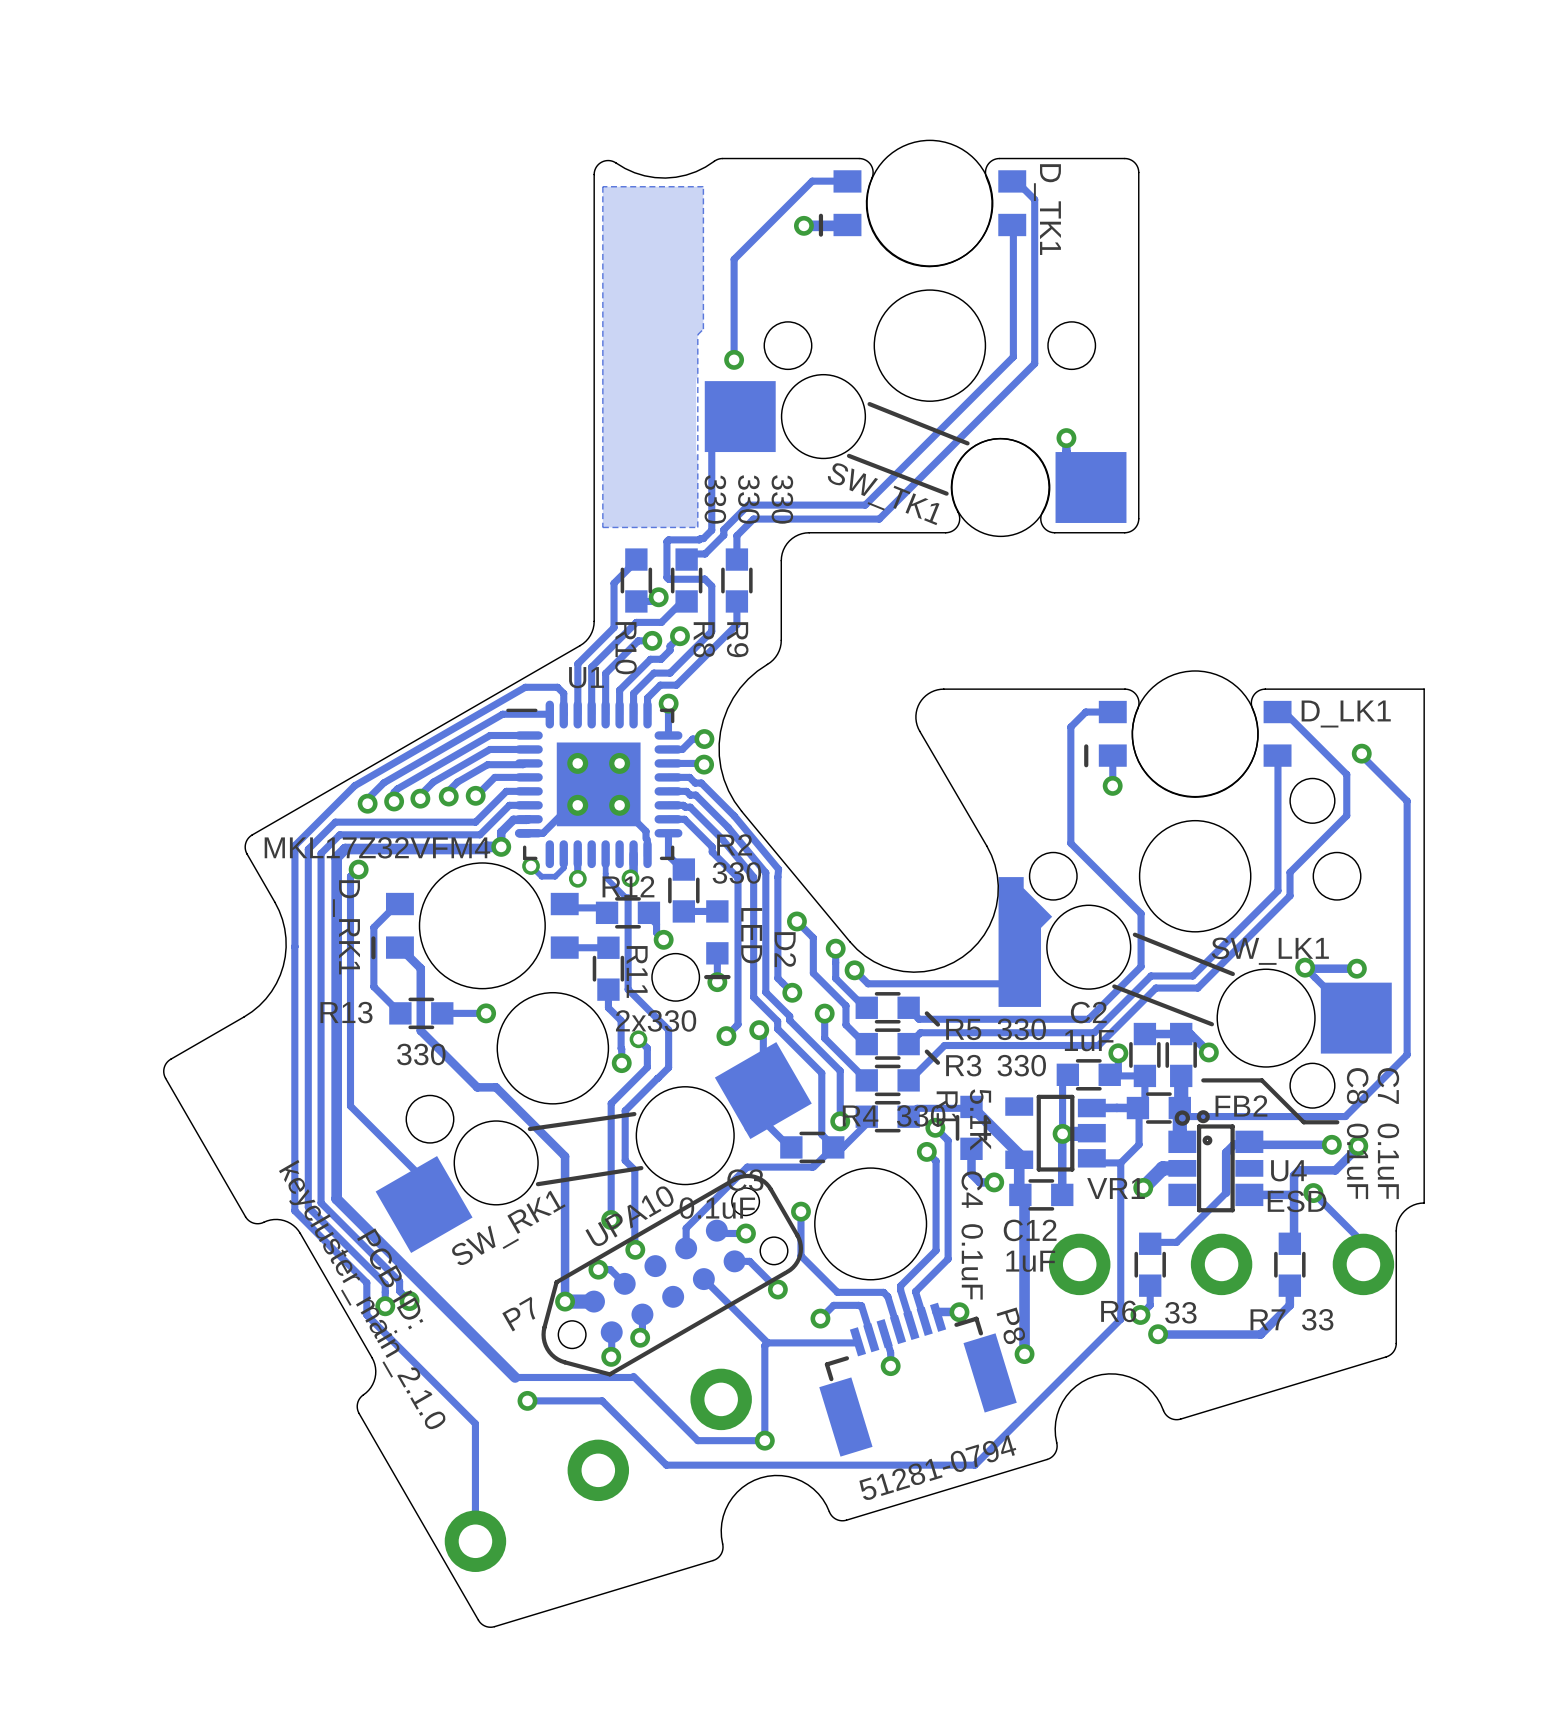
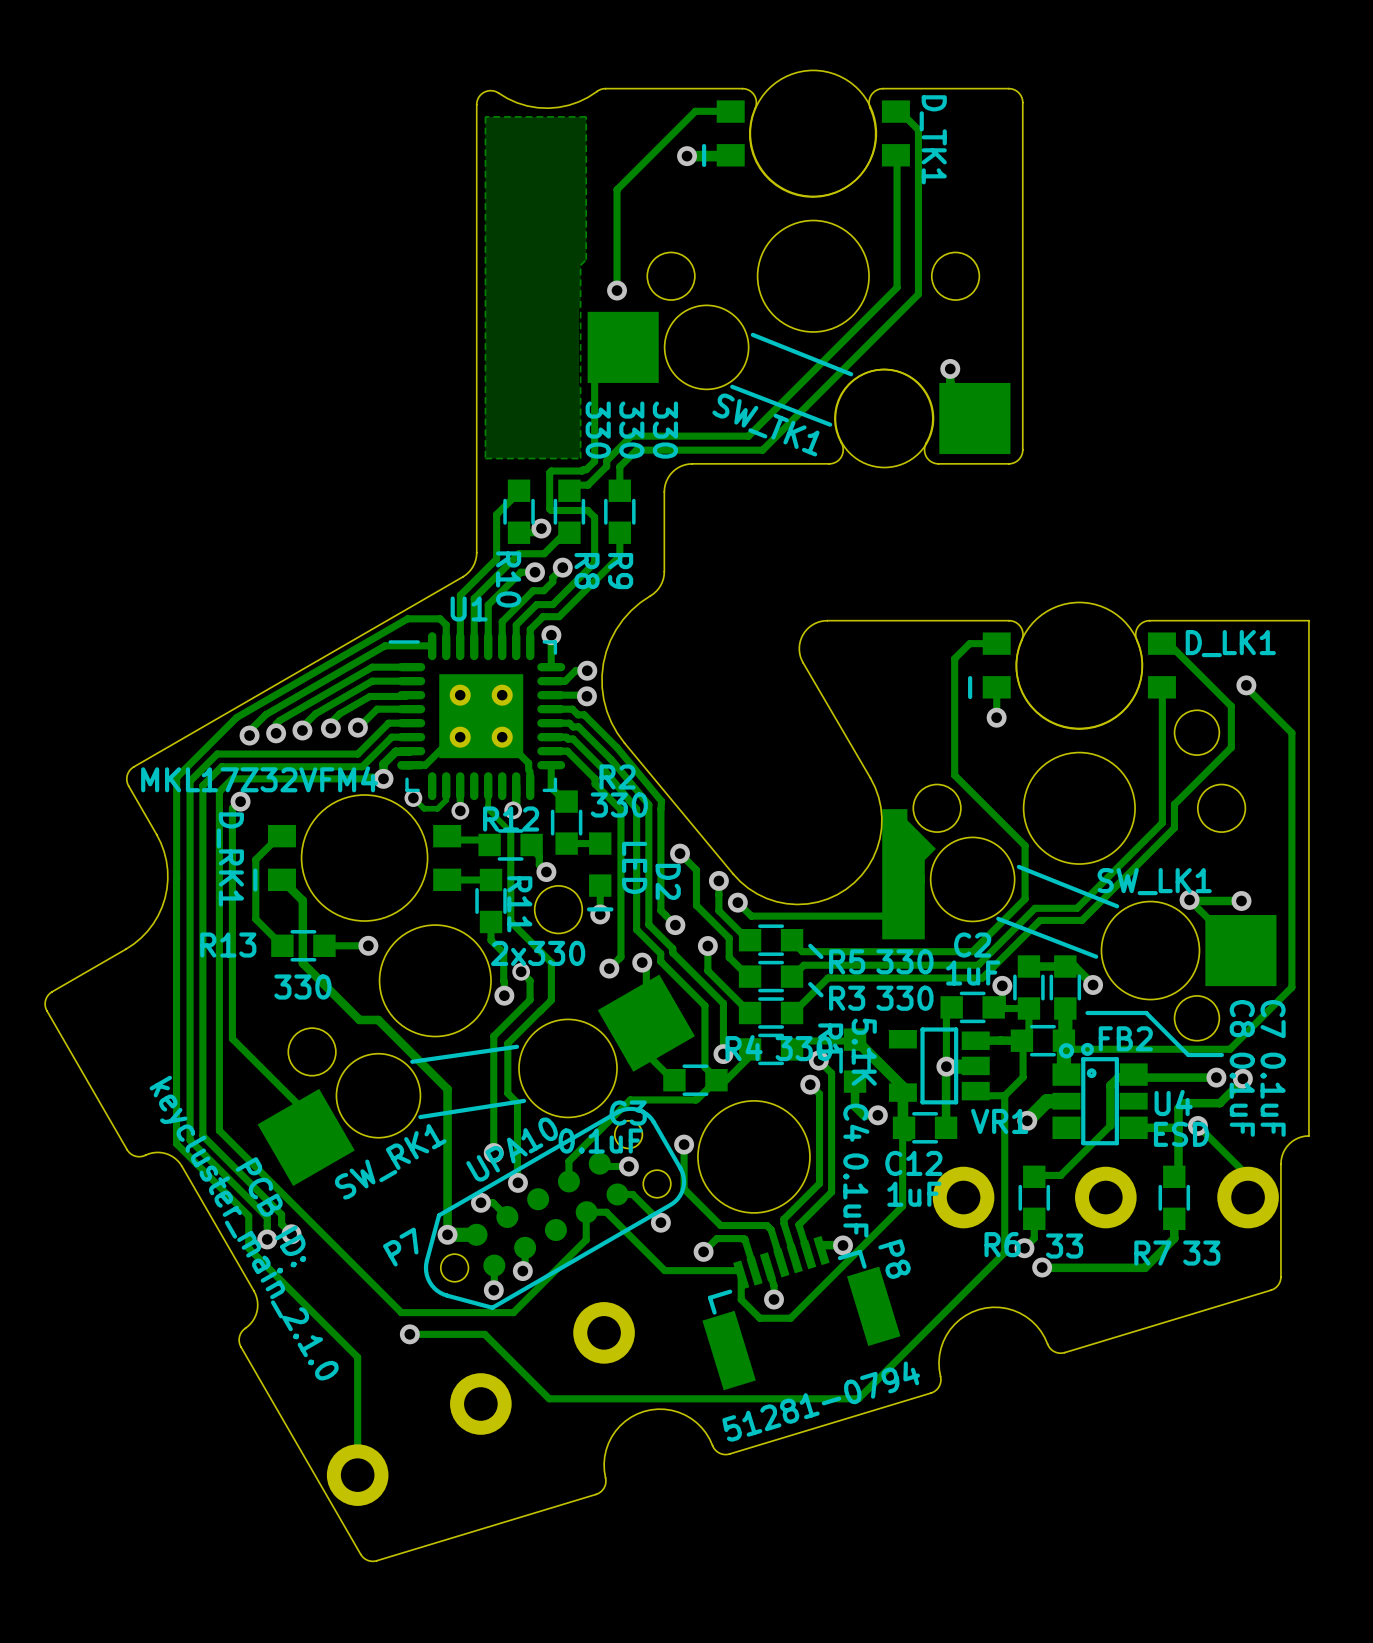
track: (487, 846) (485, 849) (345, 849) (336, 857) (336, 1198) (515, 1377) (632, 1377) -> (369, 778) (232, 778) (219, 791) (219, 1130) (401, 1312) (513, 1312) (586, 1239) (586, 1217)
track: none -> (902, 1130) (902, 1206) (790, 1318) (759, 1318) (741, 1299) (741, 1275)
track: (1024, 1203) (1024, 1354) -> none
track: (703, 1279) (767, 1342) -> (586, 1212) (606, 1212) (664, 1270) (737, 1270)
track: (767, 1342) (764, 1345) (764, 1440) (697, 1440) (633, 1376) -> none
track: (856, 1342) (767, 1342) -> none
via: (1024, 1354) -> none
via: (764, 1440) -> none

